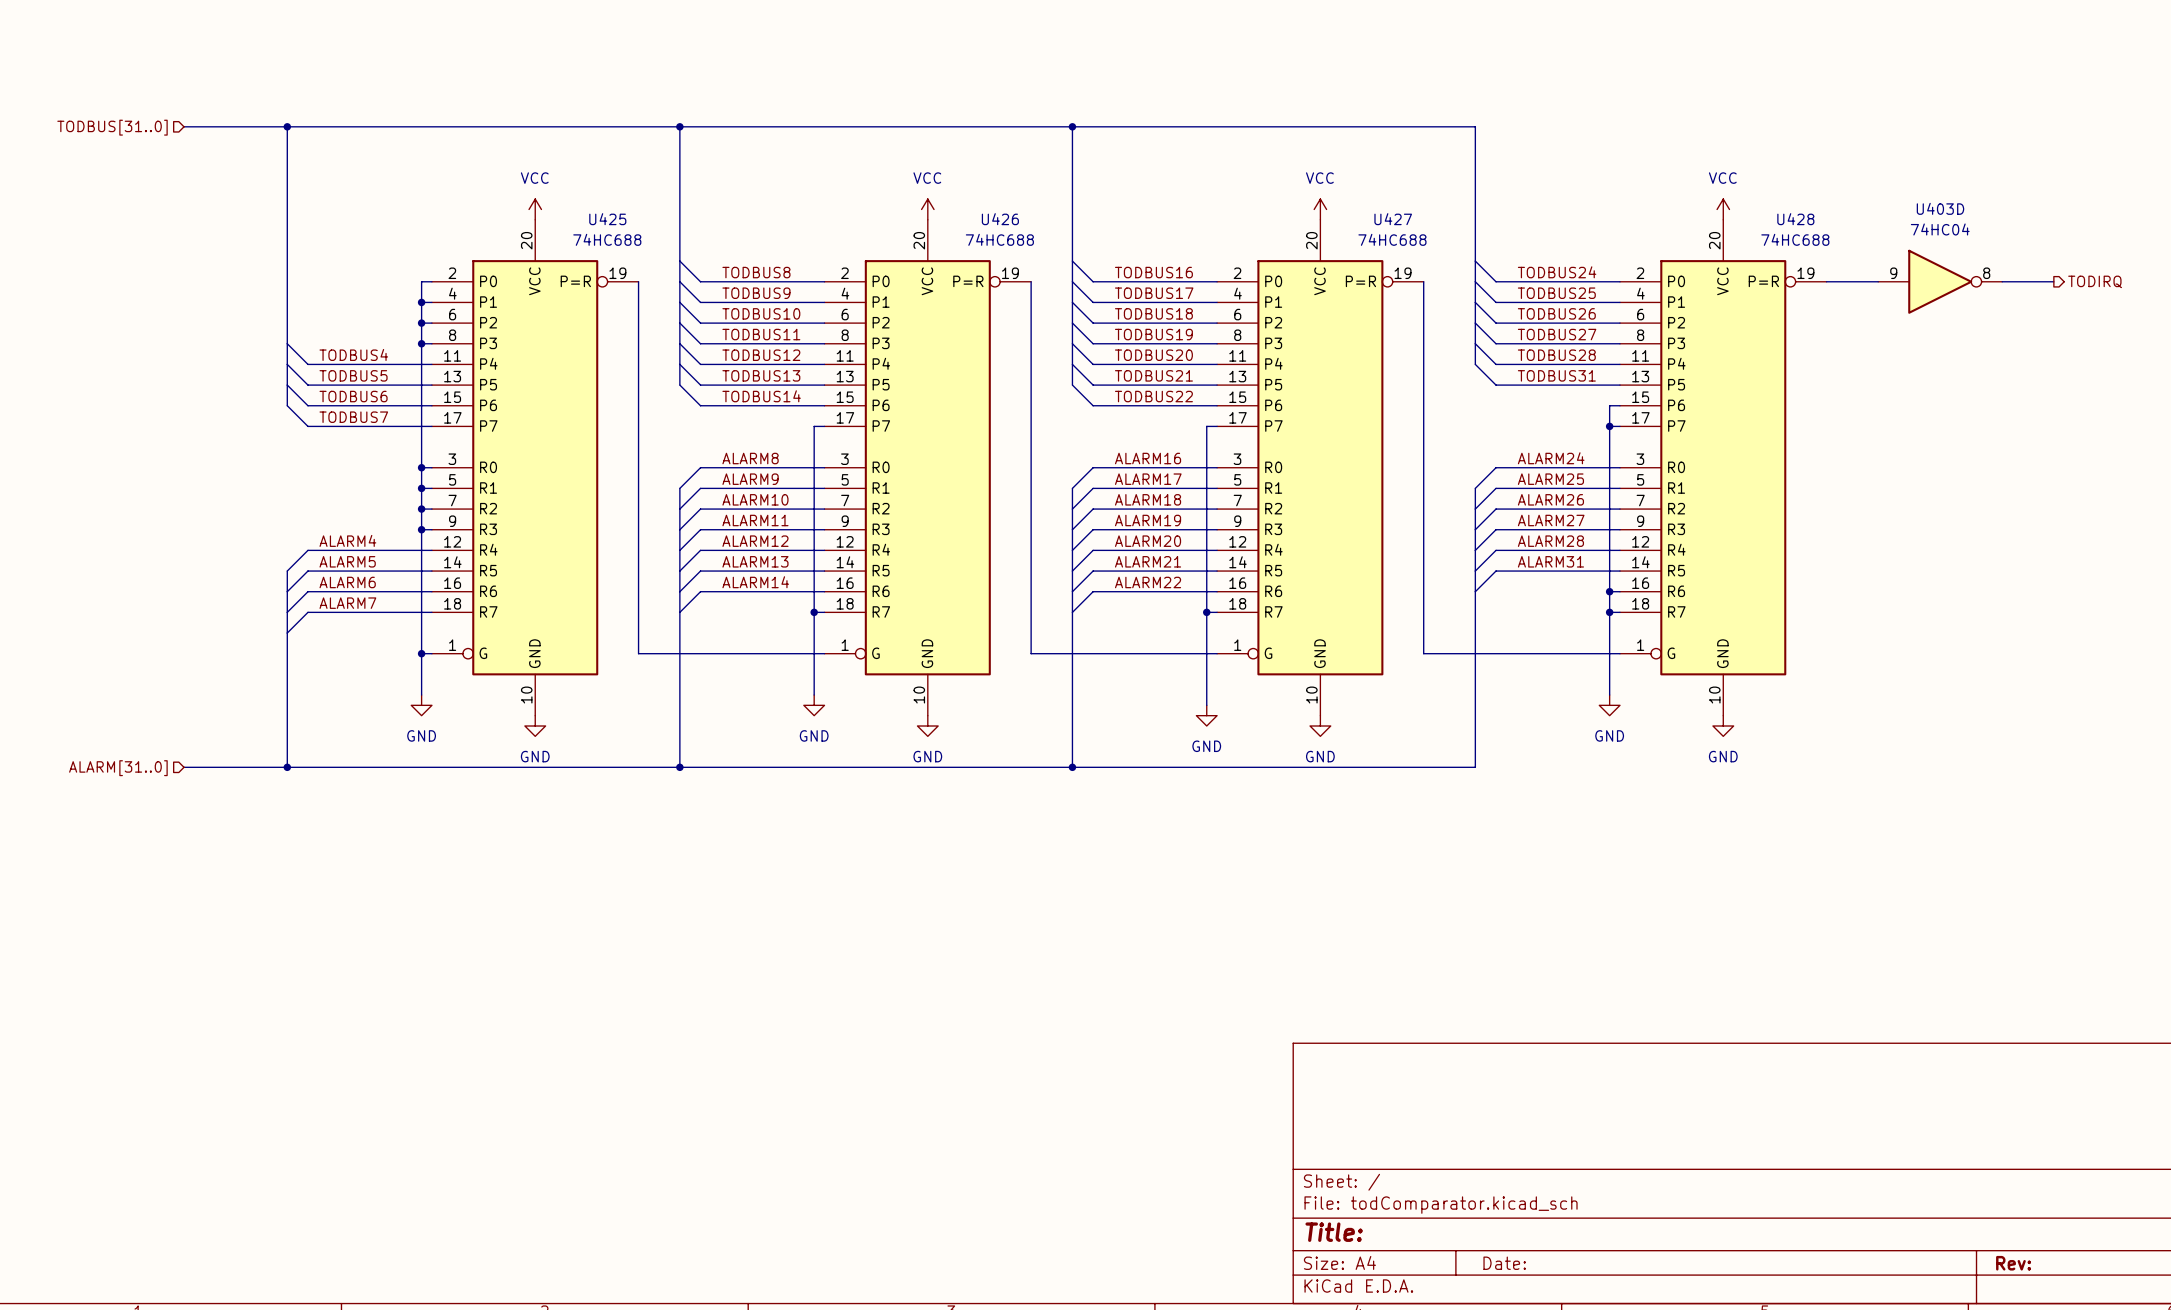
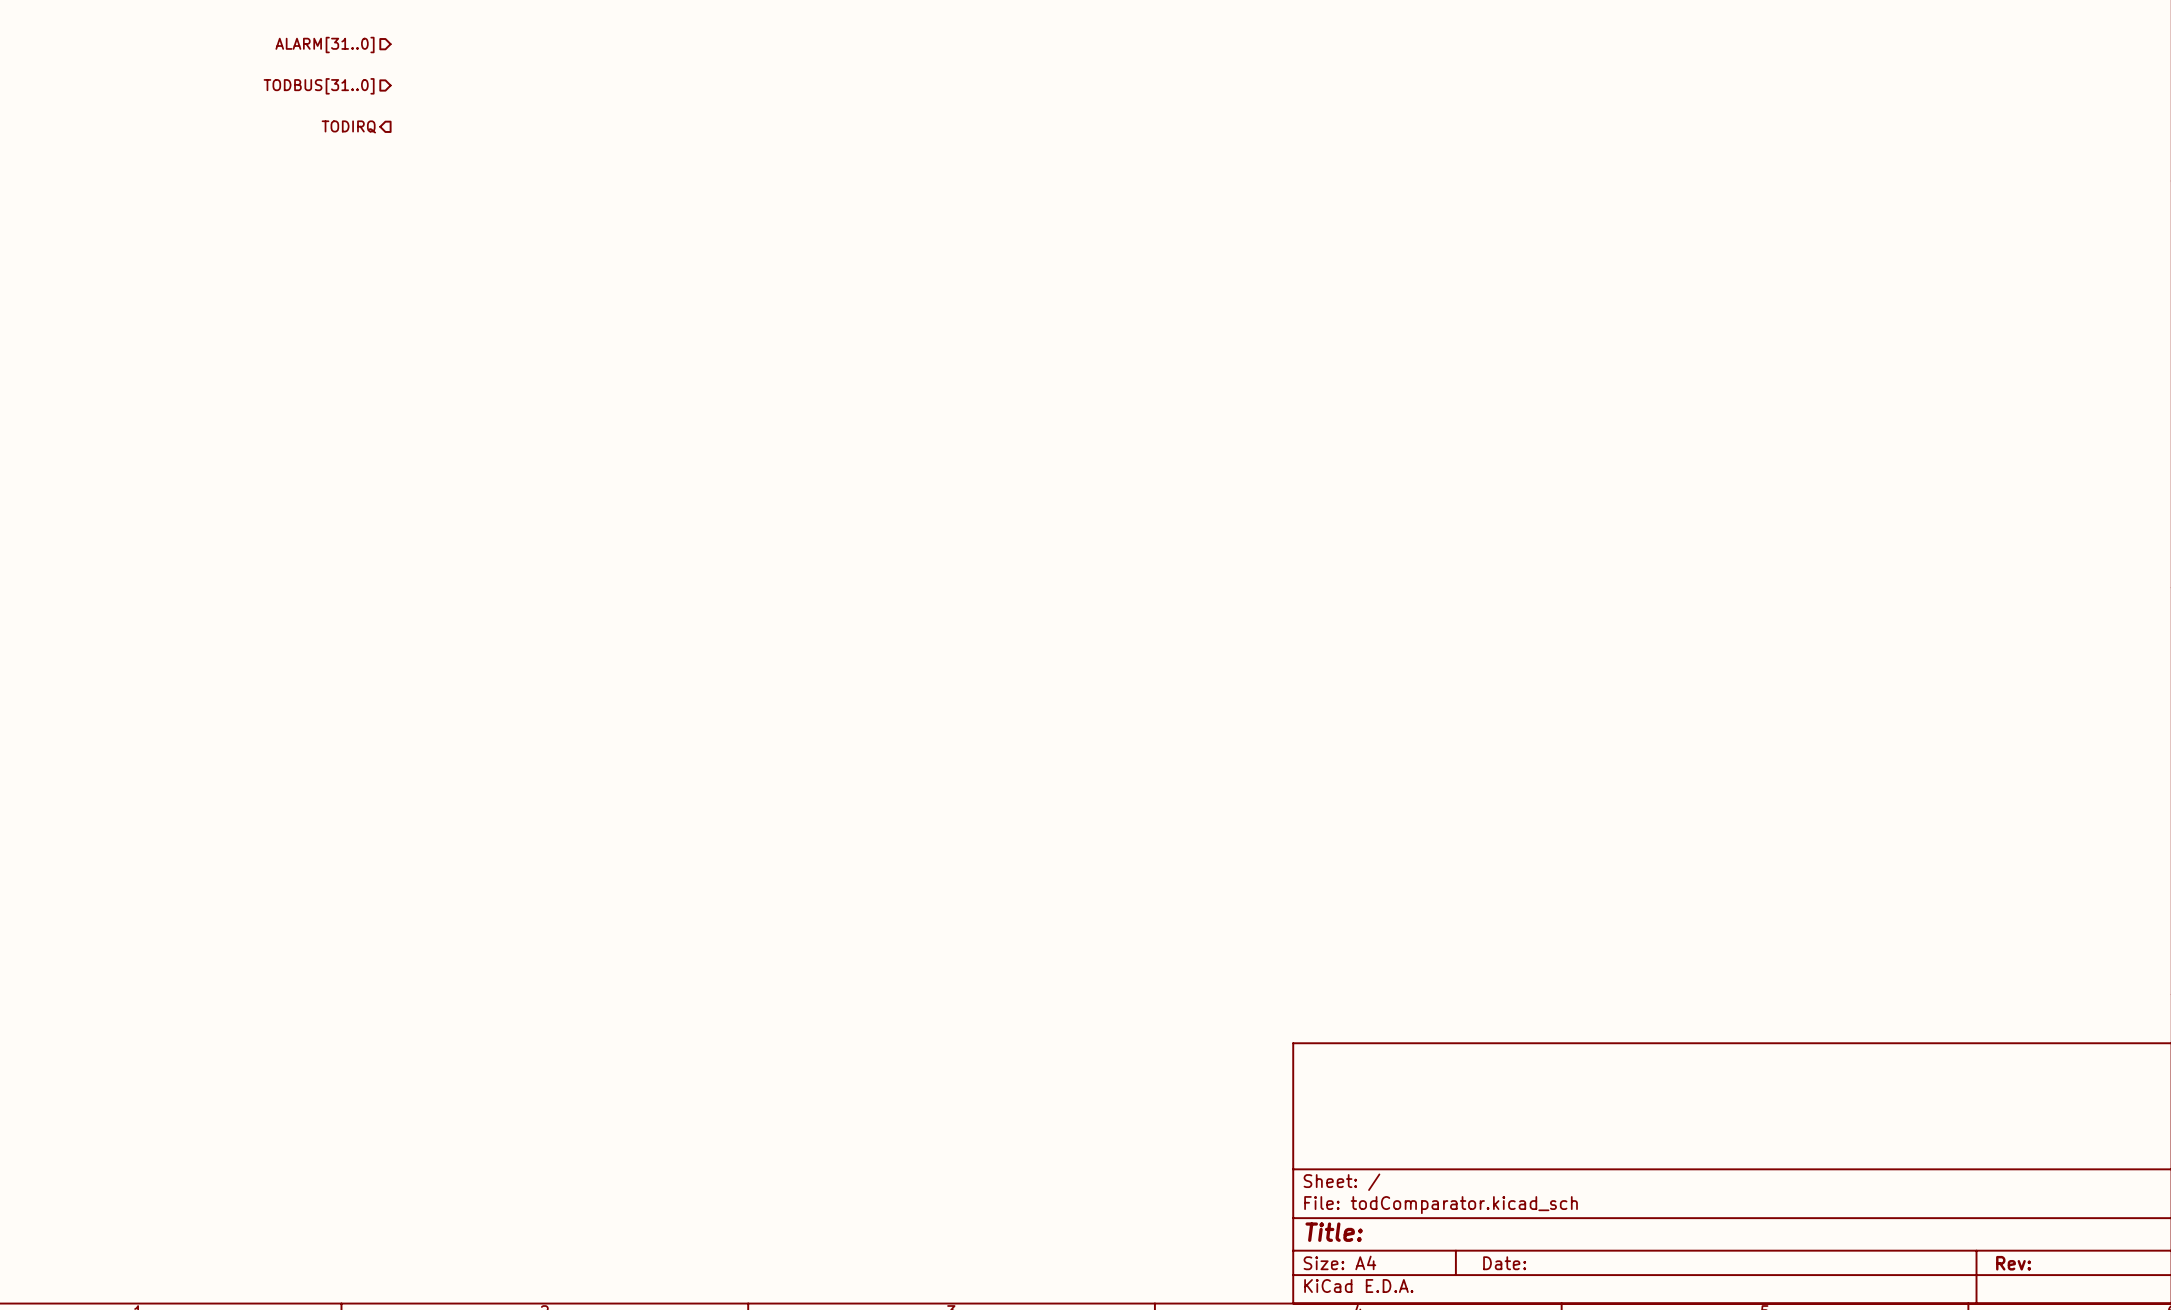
hierarchical label: none -> ALARM[31..0] (325, 45)
hierarchical label: none -> TODBUS[31..0] (319, 86)
bus: (183, 126) (1475, 126) (1475, 364) -> none
bus: (287, 126) (287, 405) -> none
junction: (287, 126) -> none
hierarchical label: none -> TODIRQ (348, 126)
bus: (679, 126) (679, 385) -> none
junction: (679, 126) -> none
bus: (1072, 126) (1072, 385) -> none
junction: (1072, 126) -> none
hierarchical label: TODBUS[31..0] (112, 127) -> none
power symbol: VCC (535, 209) -> none
power symbol: VCC (927, 209) -> none
power symbol: VCC (1320, 209) -> none
power symbol: VCC (1723, 209) -> none
wire: (679, 261) (700, 281) (824, 281) -> none
wire: (1072, 261) (1093, 281) (1217, 281) -> none
wire: (1475, 261) (1496, 281) (1619, 281) -> none
label: TODBUS8 (756, 272) -> none
label: TODBUS16 (1153, 272) -> none
label: TODBUS24 (1557, 272) -> none
wire: (431, 281) (421, 281) (421, 695) -> none
wire: (638, 281) (638, 653) (824, 653) -> none
wire: (679, 281) (700, 302) (824, 302) -> none
wire: (1031, 281) (1031, 653) (1217, 653) -> none
wire: (1072, 281) (1093, 302) (1217, 302) -> none
wire: (1423, 281) (1423, 653) (1619, 653) -> none
wire: (1475, 281) (1496, 302) (1619, 302) -> none
wire: (1826, 281) (1878, 281) -> none
U403D: 74HC04 (1940, 281) -> none
wire: (2002, 281) (2053, 281) -> none
hierarchical label: TODIRQ (2095, 281) -> none
label: TODBUS9 (756, 293) -> none
label: TODBUS17 (1154, 293) -> none
label: TODBUS25 (1556, 293) -> none
wire: (421, 302) (431, 302) -> none
junction: (421, 302) -> none
wire: (679, 302) (700, 323) (824, 323) -> none
wire: (1072, 302) (1093, 323) (1217, 323) -> none
wire: (1475, 302) (1496, 323) (1619, 323) -> none
label: TODBUS10 (761, 313) -> none
label: TODBUS18 (1153, 313) -> none
label: TODBUS26 (1556, 313) -> none
wire: (421, 323) (431, 323) -> none
junction: (421, 323) -> none
wire: (679, 323) (700, 343) (824, 343) -> none
wire: (1072, 323) (1093, 343) (1217, 343) -> none
wire: (1475, 323) (1496, 343) (1619, 343) -> none
label: TODBUS11 (761, 334) -> none
label: TODBUS19 (1153, 334) -> none
label: TODBUS27 (1557, 334) -> none
wire: (287, 343) (307, 364) (431, 364) -> none
wire: (421, 343) (431, 343) -> none
junction: (421, 343) -> none
wire: (679, 343) (700, 364) (824, 364) -> none
wire: (1072, 343) (1093, 364) (1217, 364) -> none
wire: (1475, 343) (1496, 364) (1619, 364) -> none
label: TODBUS4 (353, 354) -> none
label: TODBUS12 (761, 355) -> none
label: TODBUS20 (1153, 355) -> none
label: TODBUS28 (1556, 355) -> none
wire: (287, 364) (307, 385) (431, 385) -> none
wire: (679, 364) (700, 385) (824, 385) -> none
wire: (1072, 364) (1093, 385) (1217, 385) -> none
wire: (1475, 364) (1496, 385) (1619, 385) -> none
label: TODBUS5 (353, 375) -> none
label: TODBUS13 (761, 375) -> none
label: TODBUS21 (1153, 375) -> none
label: TODBUS31 (1556, 375) -> none
wire: (287, 385) (307, 405) (431, 405) -> none
wire: (679, 385) (700, 405) (824, 405) -> none
wire: (1072, 385) (1093, 405) (1217, 405) -> none
label: TODBUS6 (353, 396) -> none
label: TODBUS14 (761, 396) -> none
label: TODBUS22 (1153, 396) -> none
wire: (287, 405) (307, 426) (431, 426) -> none
wire: (1619, 405) (1609, 405) (1609, 695) -> none
label: TODBUS7 (353, 417) -> none
wire: (824, 426) (814, 426) (814, 695) -> none
wire: (1217, 426) (1206, 426) (1206, 705) -> none
wire: (1609, 426) (1619, 426) -> none
junction: (1609, 426) -> none
label: ALARM8 (750, 458) -> none
label: ALARM16 (1148, 458) -> none
label: ALARM24 (1551, 458) -> none
wire: (421, 467) (431, 467) -> none
junction: (421, 467) -> none
U425: 74HC688 (535, 467) -> none
wire: (824, 467) (700, 467) (679, 488) -> none
U426: 74HC688 (927, 467) -> none
wire: (1217, 467) (1093, 467) (1072, 488) -> none
U427: 74HC688 (1320, 467) -> none
wire: (1619, 467) (1496, 467) (1475, 488) -> none
U428: 74HC688 (1723, 467) -> none
label: ALARM9 (750, 479) -> none
label: ALARM17 (1148, 479) -> none
label: ALARM25 (1550, 479) -> none
wire: (421, 488) (431, 488) -> none
junction: (421, 488) -> none
bus: (679, 488) (679, 767) -> none
wire: (824, 488) (700, 488) (679, 509) -> none
bus: (1072, 488) (1072, 767) -> none
wire: (1217, 488) (1093, 488) (1072, 509) -> none
bus: (1475, 488) (1475, 767) (183, 767) -> none
wire: (1619, 488) (1496, 488) (1475, 509) -> none
label: ALARM10 (755, 499) -> none
label: ALARM18 (1148, 499) -> none
label: ALARM26 (1550, 499) -> none
wire: (421, 509) (431, 509) -> none
junction: (421, 509) -> none
wire: (824, 509) (700, 509) (679, 529) -> none
wire: (1217, 509) (1093, 509) (1072, 529) -> none
wire: (1619, 509) (1496, 509) (1475, 529) -> none
label: ALARM11 (755, 520) -> none
label: ALARM19 (1148, 520) -> none
label: ALARM27 (1551, 520) -> none
wire: (421, 529) (431, 529) -> none
junction: (421, 529) -> none
wire: (824, 529) (700, 529) (679, 550) -> none
wire: (1217, 529) (1093, 529) (1072, 550) -> none
wire: (1619, 529) (1496, 529) (1475, 550) -> none
label: ALARM4 (347, 540) -> none
label: ALARM12 (755, 541) -> none
label: ALARM20 (1148, 541) -> none
label: ALARM28 (1550, 541) -> none
wire: (431, 550) (307, 550) (287, 571) -> none
wire: (824, 550) (700, 550) (679, 571) -> none
wire: (1217, 550) (1093, 550) (1072, 571) -> none
wire: (1619, 550) (1496, 550) (1475, 571) -> none
label: ALARM5 (347, 561) -> none
label: ALARM13 (755, 561) -> none
label: ALARM21 (1148, 561) -> none
label: ALARM31 (1550, 561) -> none
bus: (287, 571) (287, 767) -> none
wire: (431, 571) (307, 571) (287, 591) -> none
wire: (824, 571) (700, 571) (679, 591) -> none
wire: (1217, 571) (1093, 571) (1072, 591) -> none
wire: (1619, 571) (1496, 571) (1475, 591) -> none
label: ALARM6 (347, 582) -> none
label: ALARM14 (755, 582) -> none
label: ALARM22 (1148, 582) -> none
wire: (431, 591) (307, 591) (287, 612) -> none
wire: (824, 591) (700, 591) (679, 612) -> none
wire: (1217, 591) (1093, 591) (1072, 612) -> none
wire: (1609, 591) (1619, 591) -> none
junction: (1609, 591) -> none
label: ALARM7 (347, 603) -> none
wire: (431, 612) (307, 612) (287, 633) -> none
wire: (814, 612) (824, 612) -> none
junction: (814, 612) -> none
wire: (1206, 612) (1217, 612) -> none
junction: (1206, 612) -> none
wire: (1609, 612) (1619, 612) -> none
junction: (1609, 612) -> none
wire: (421, 653) (431, 653) -> none
junction: (421, 653) -> none
power symbol: GND (421, 705) -> none
power symbol: GND (814, 705) -> none
power symbol: GND (1609, 705) -> none
power symbol: GND (1206, 715) -> none
power symbol: GND (535, 726) -> none
power symbol: GND (927, 726) -> none
power symbol: GND (1320, 726) -> none
power symbol: GND (1723, 726) -> none
junction: (287, 767) -> none
junction: (679, 767) -> none
junction: (1072, 767) -> none
hierarchical label: ALARM[31..0] (118, 768) -> none

